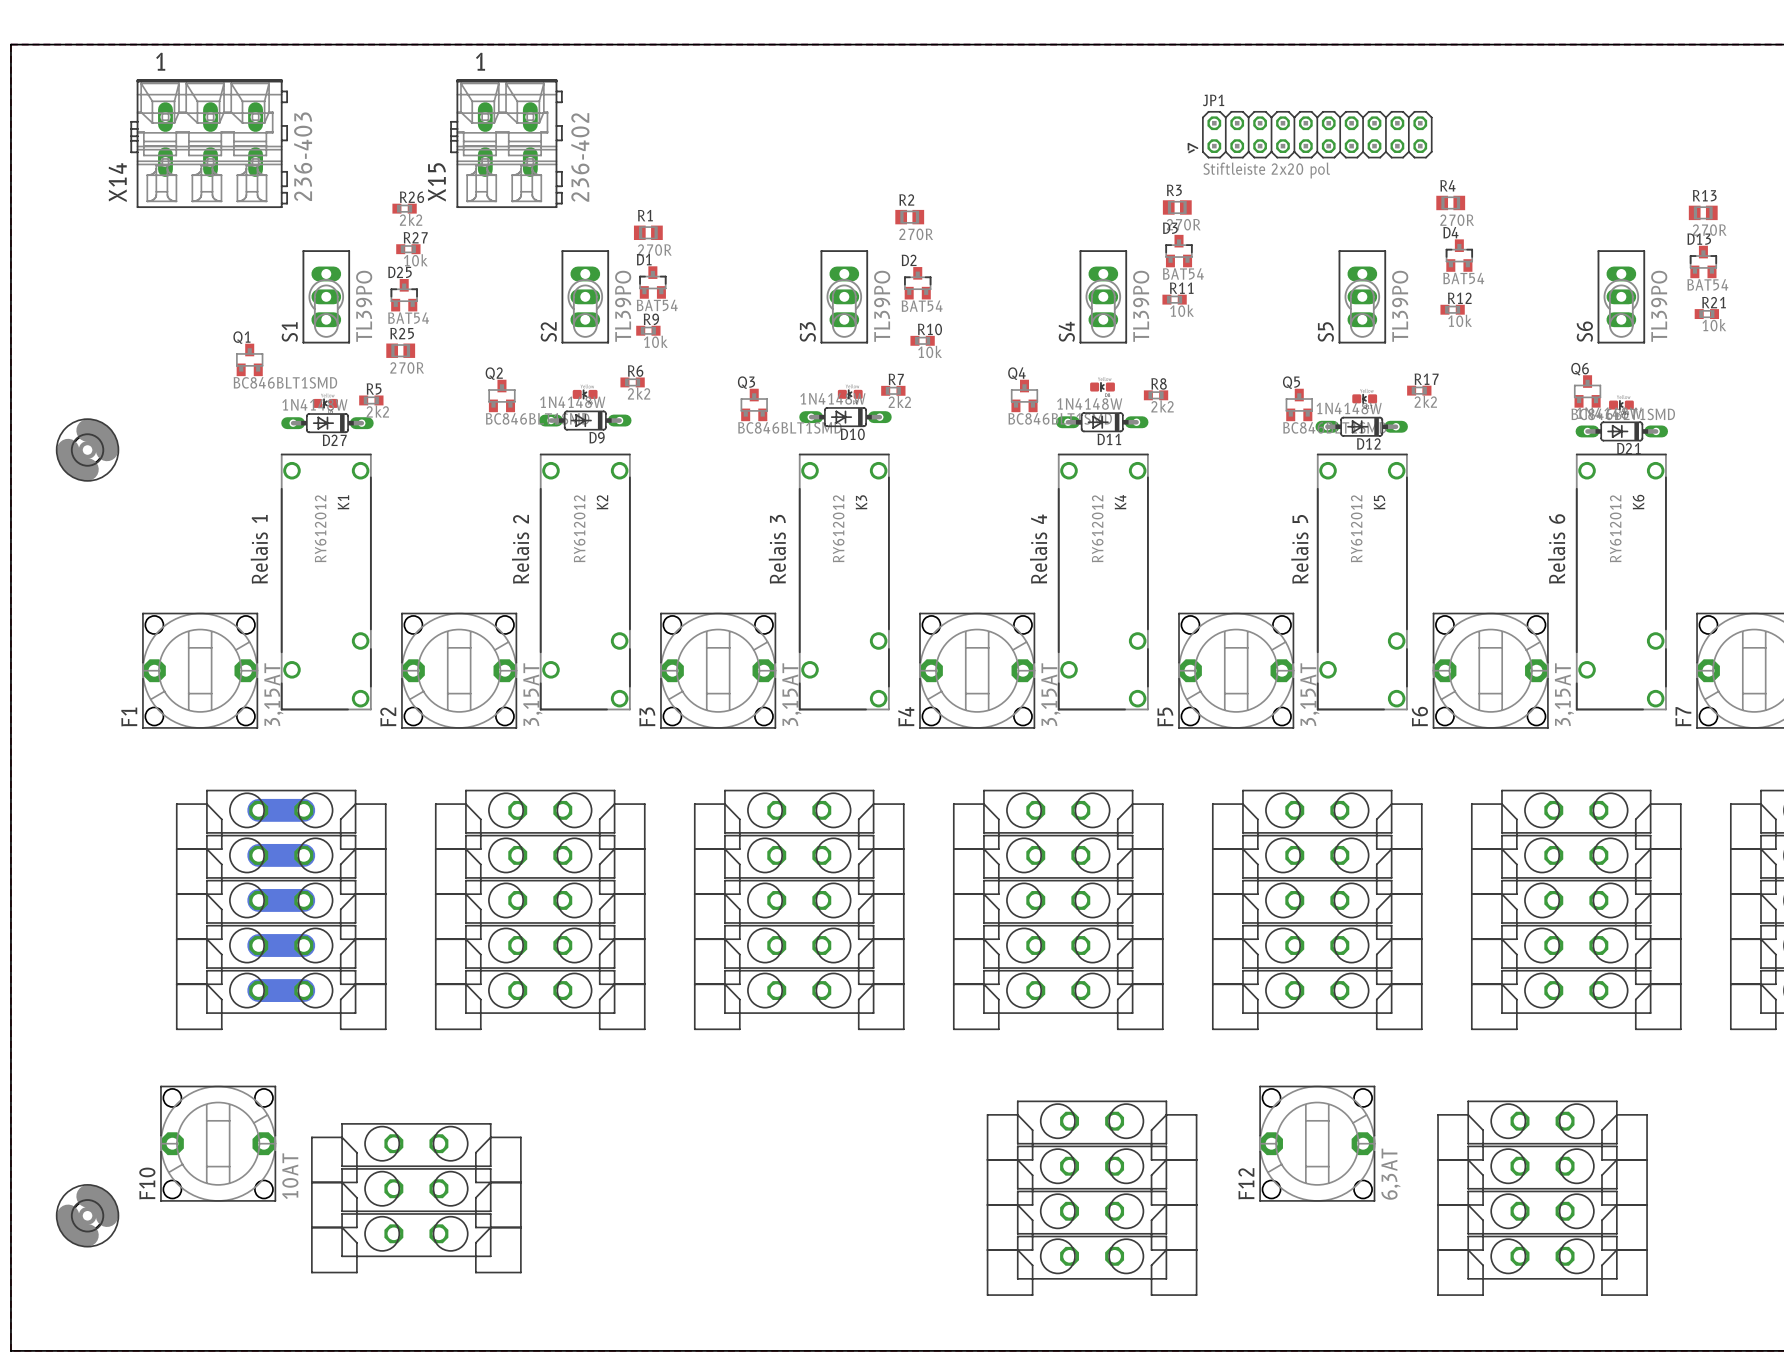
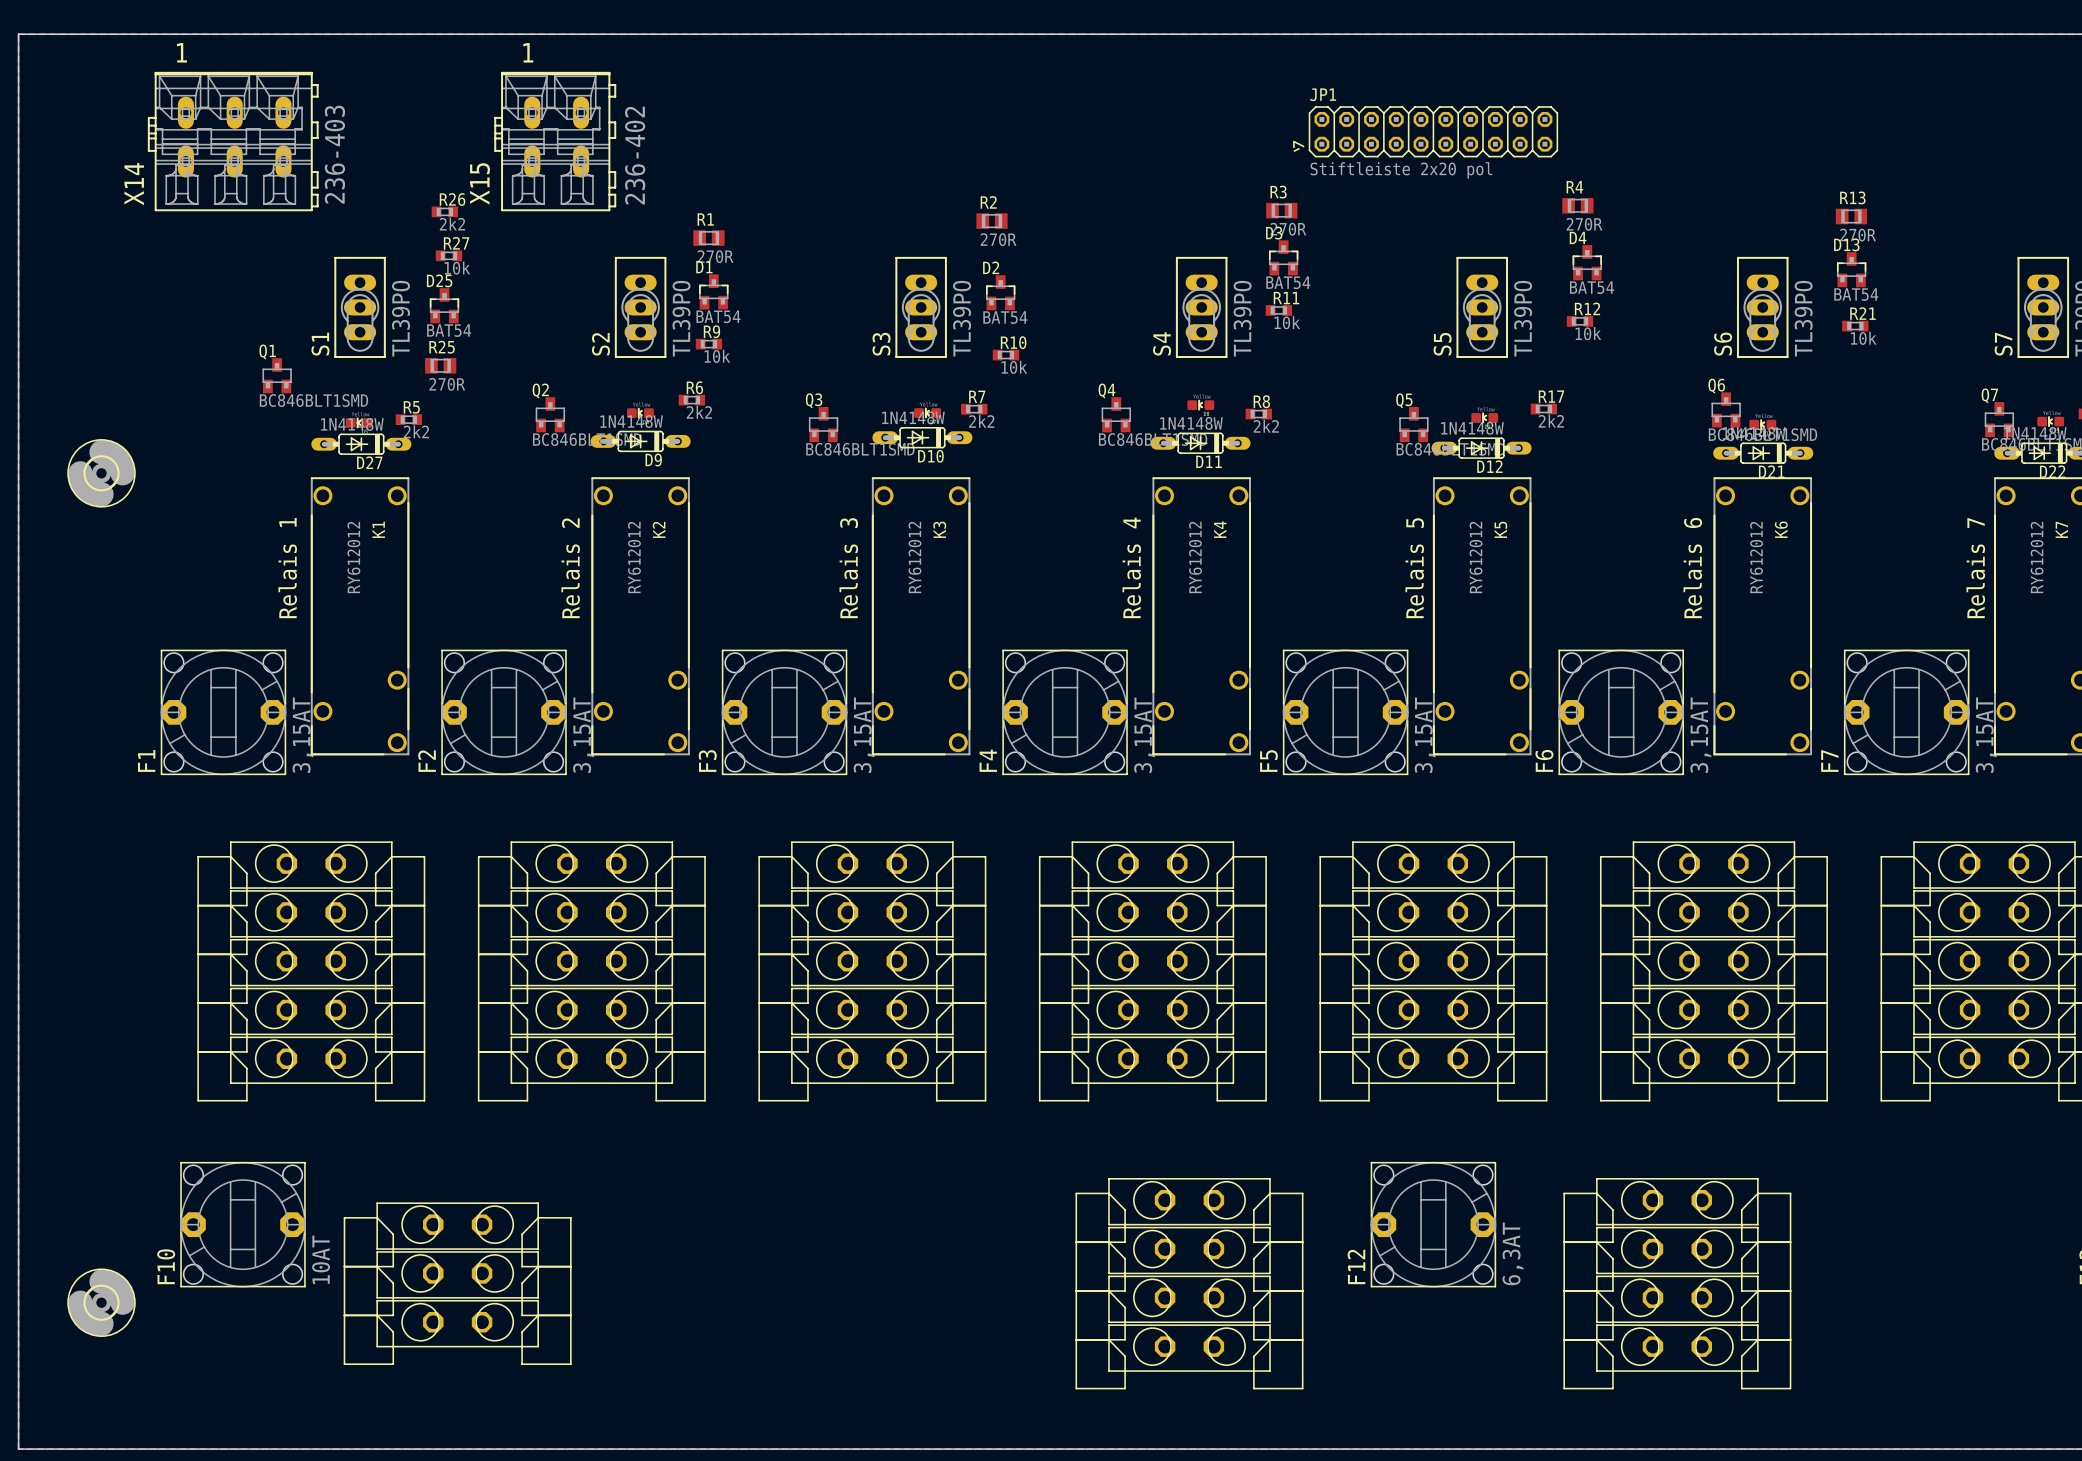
bottom track: (258, 810) (303, 810) -> none
bottom track: (258, 855) (303, 855) -> none
bottom track: (258, 900) (303, 900) -> none
bottom track: (258, 945) (303, 945) -> none
bottom track: (258, 990) (303, 990) -> none

